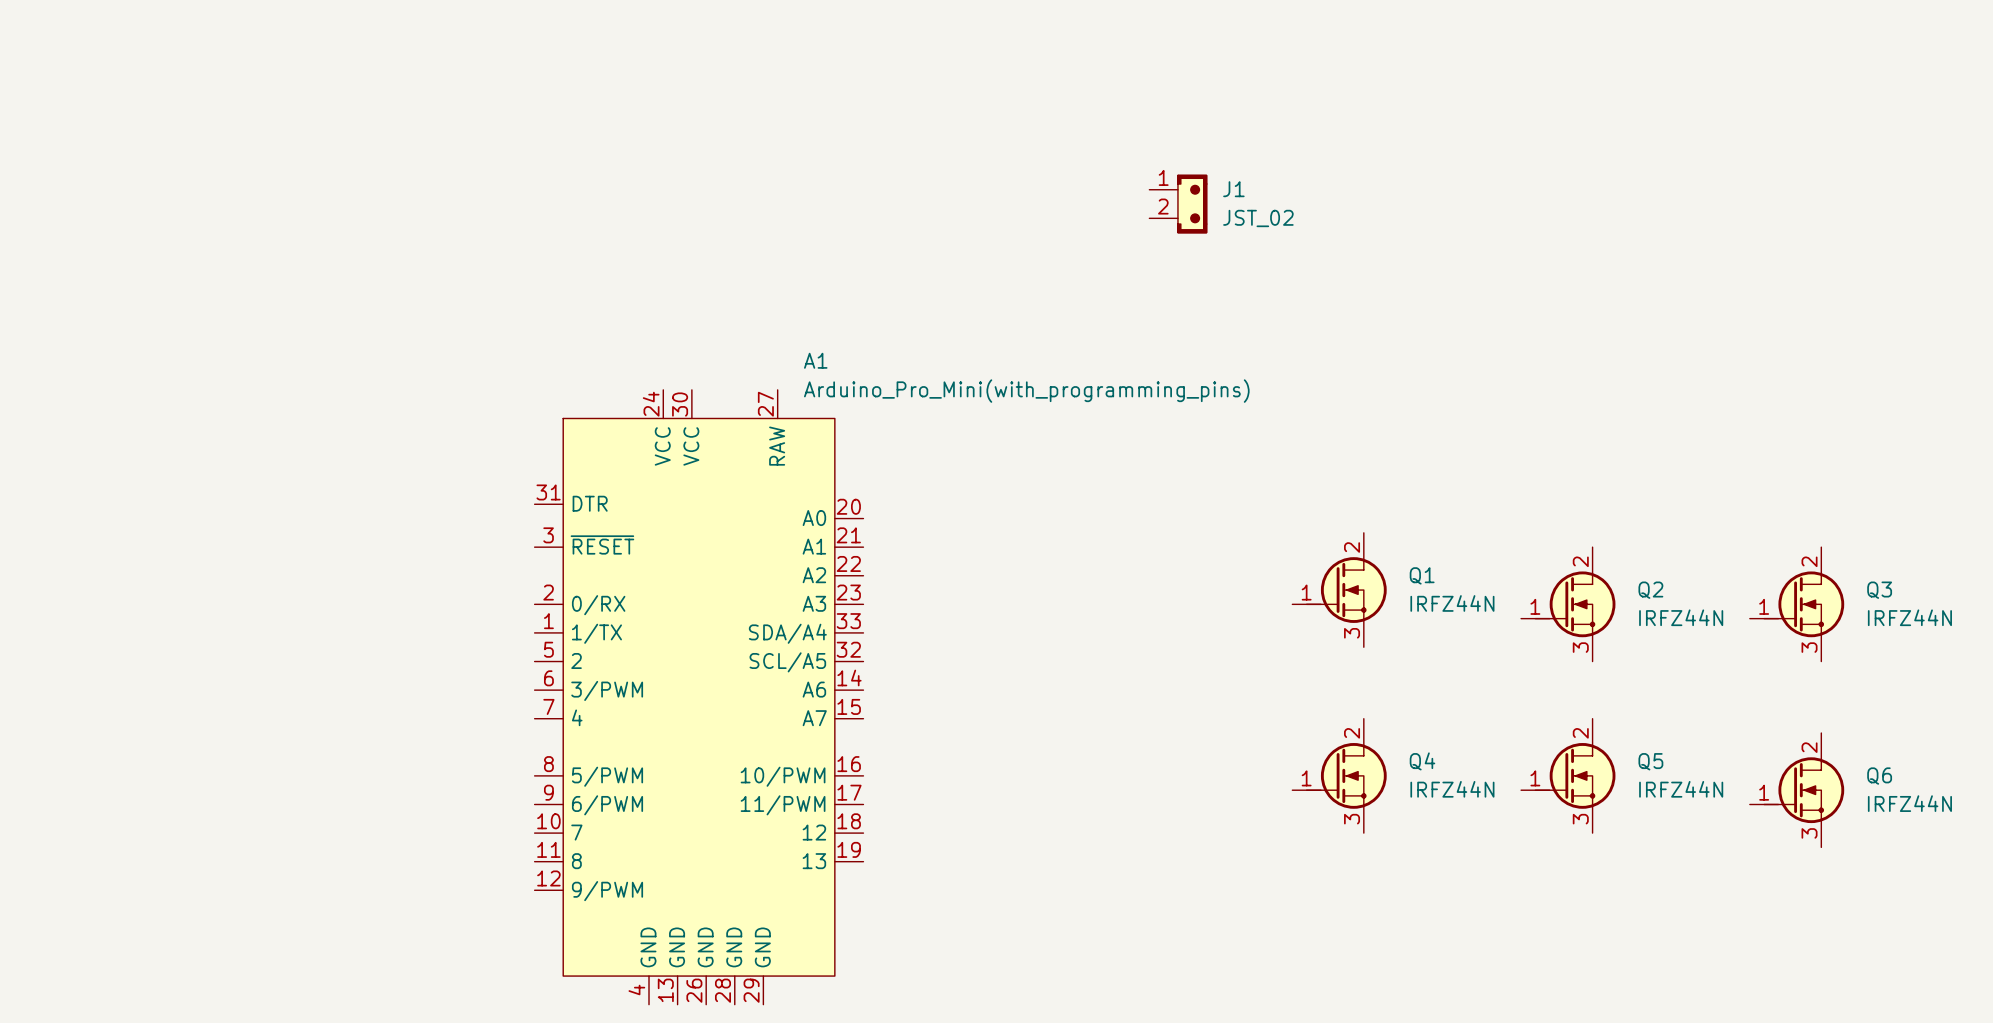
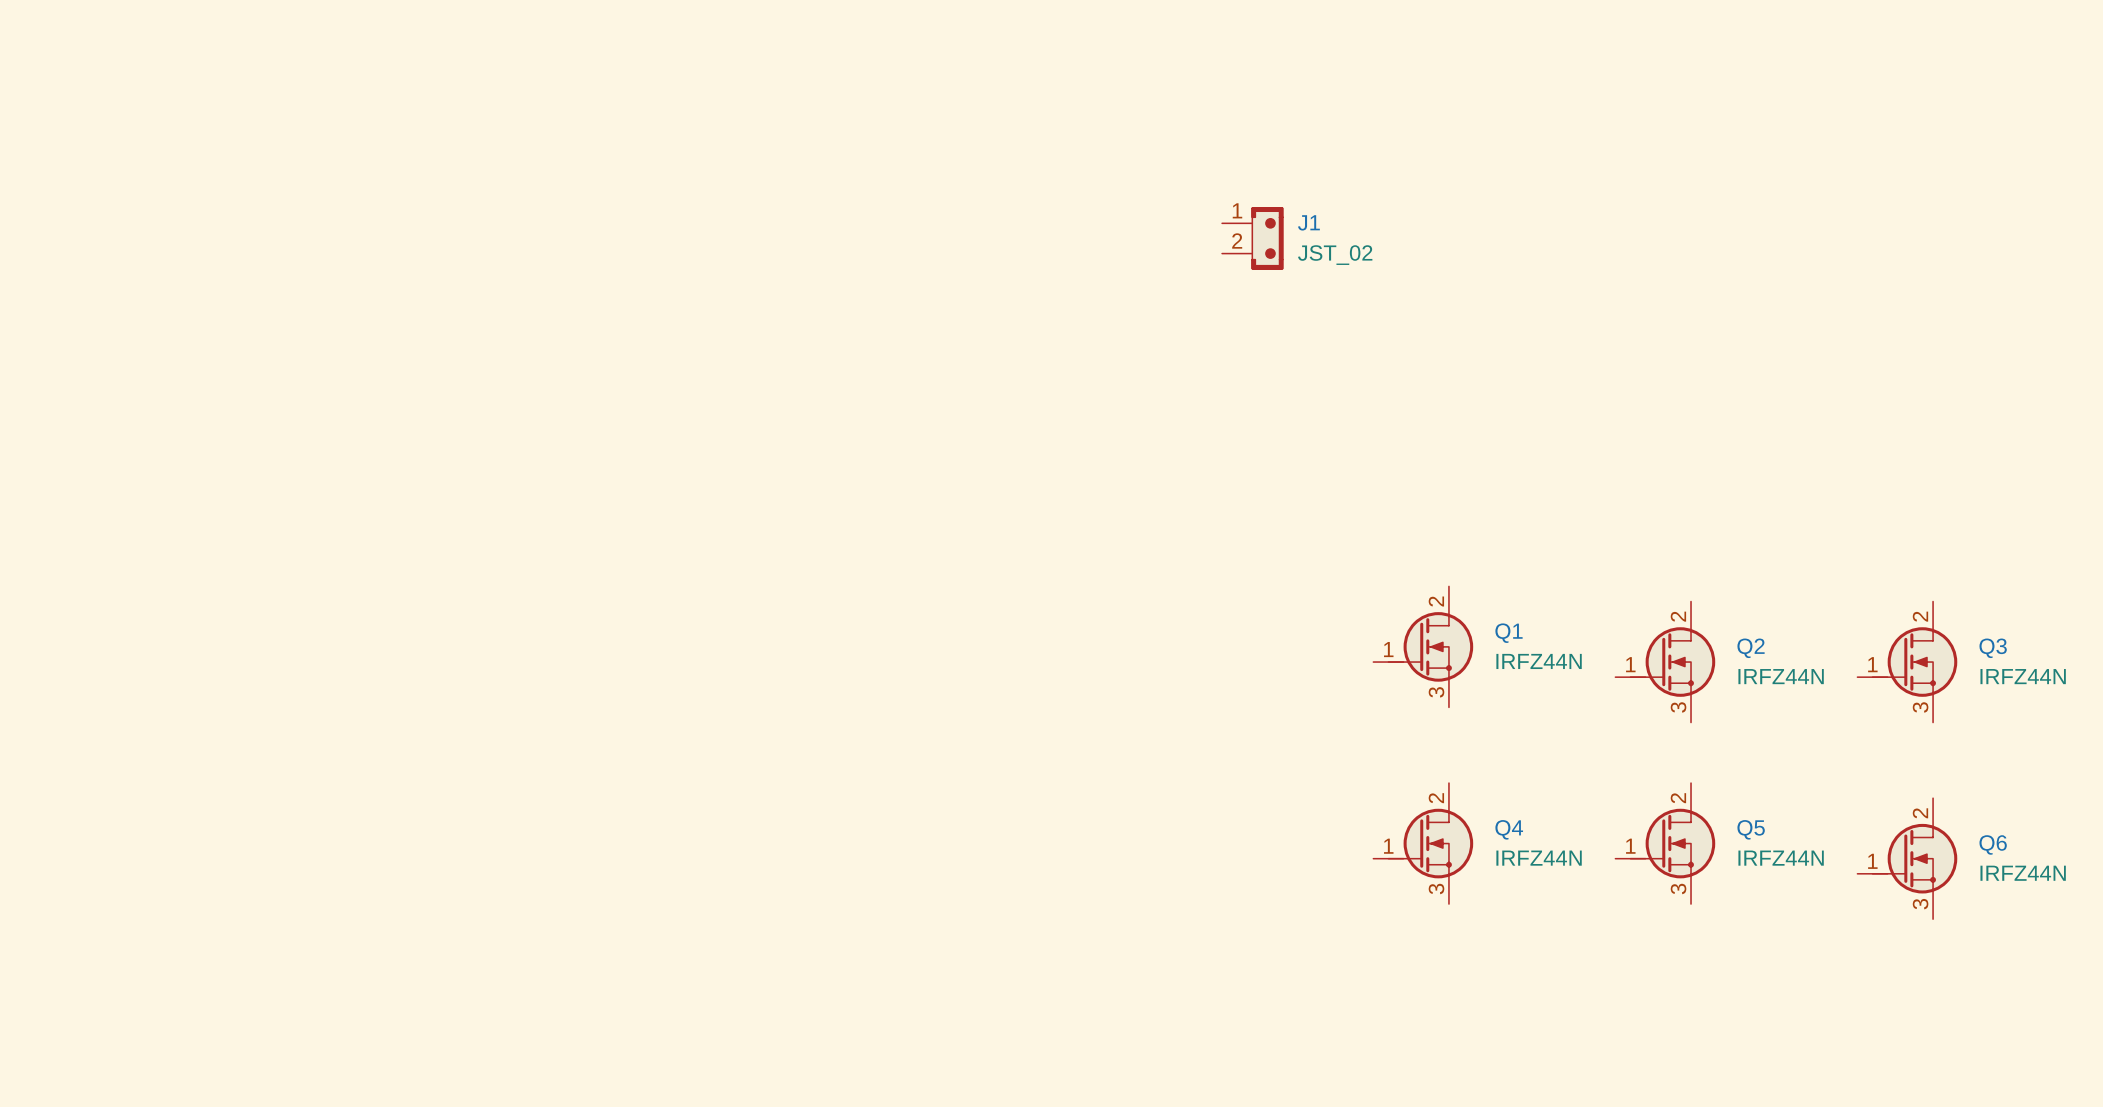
A1: Arduino_Pro_Mini(with_programming_pins) (699, 697) -> none

